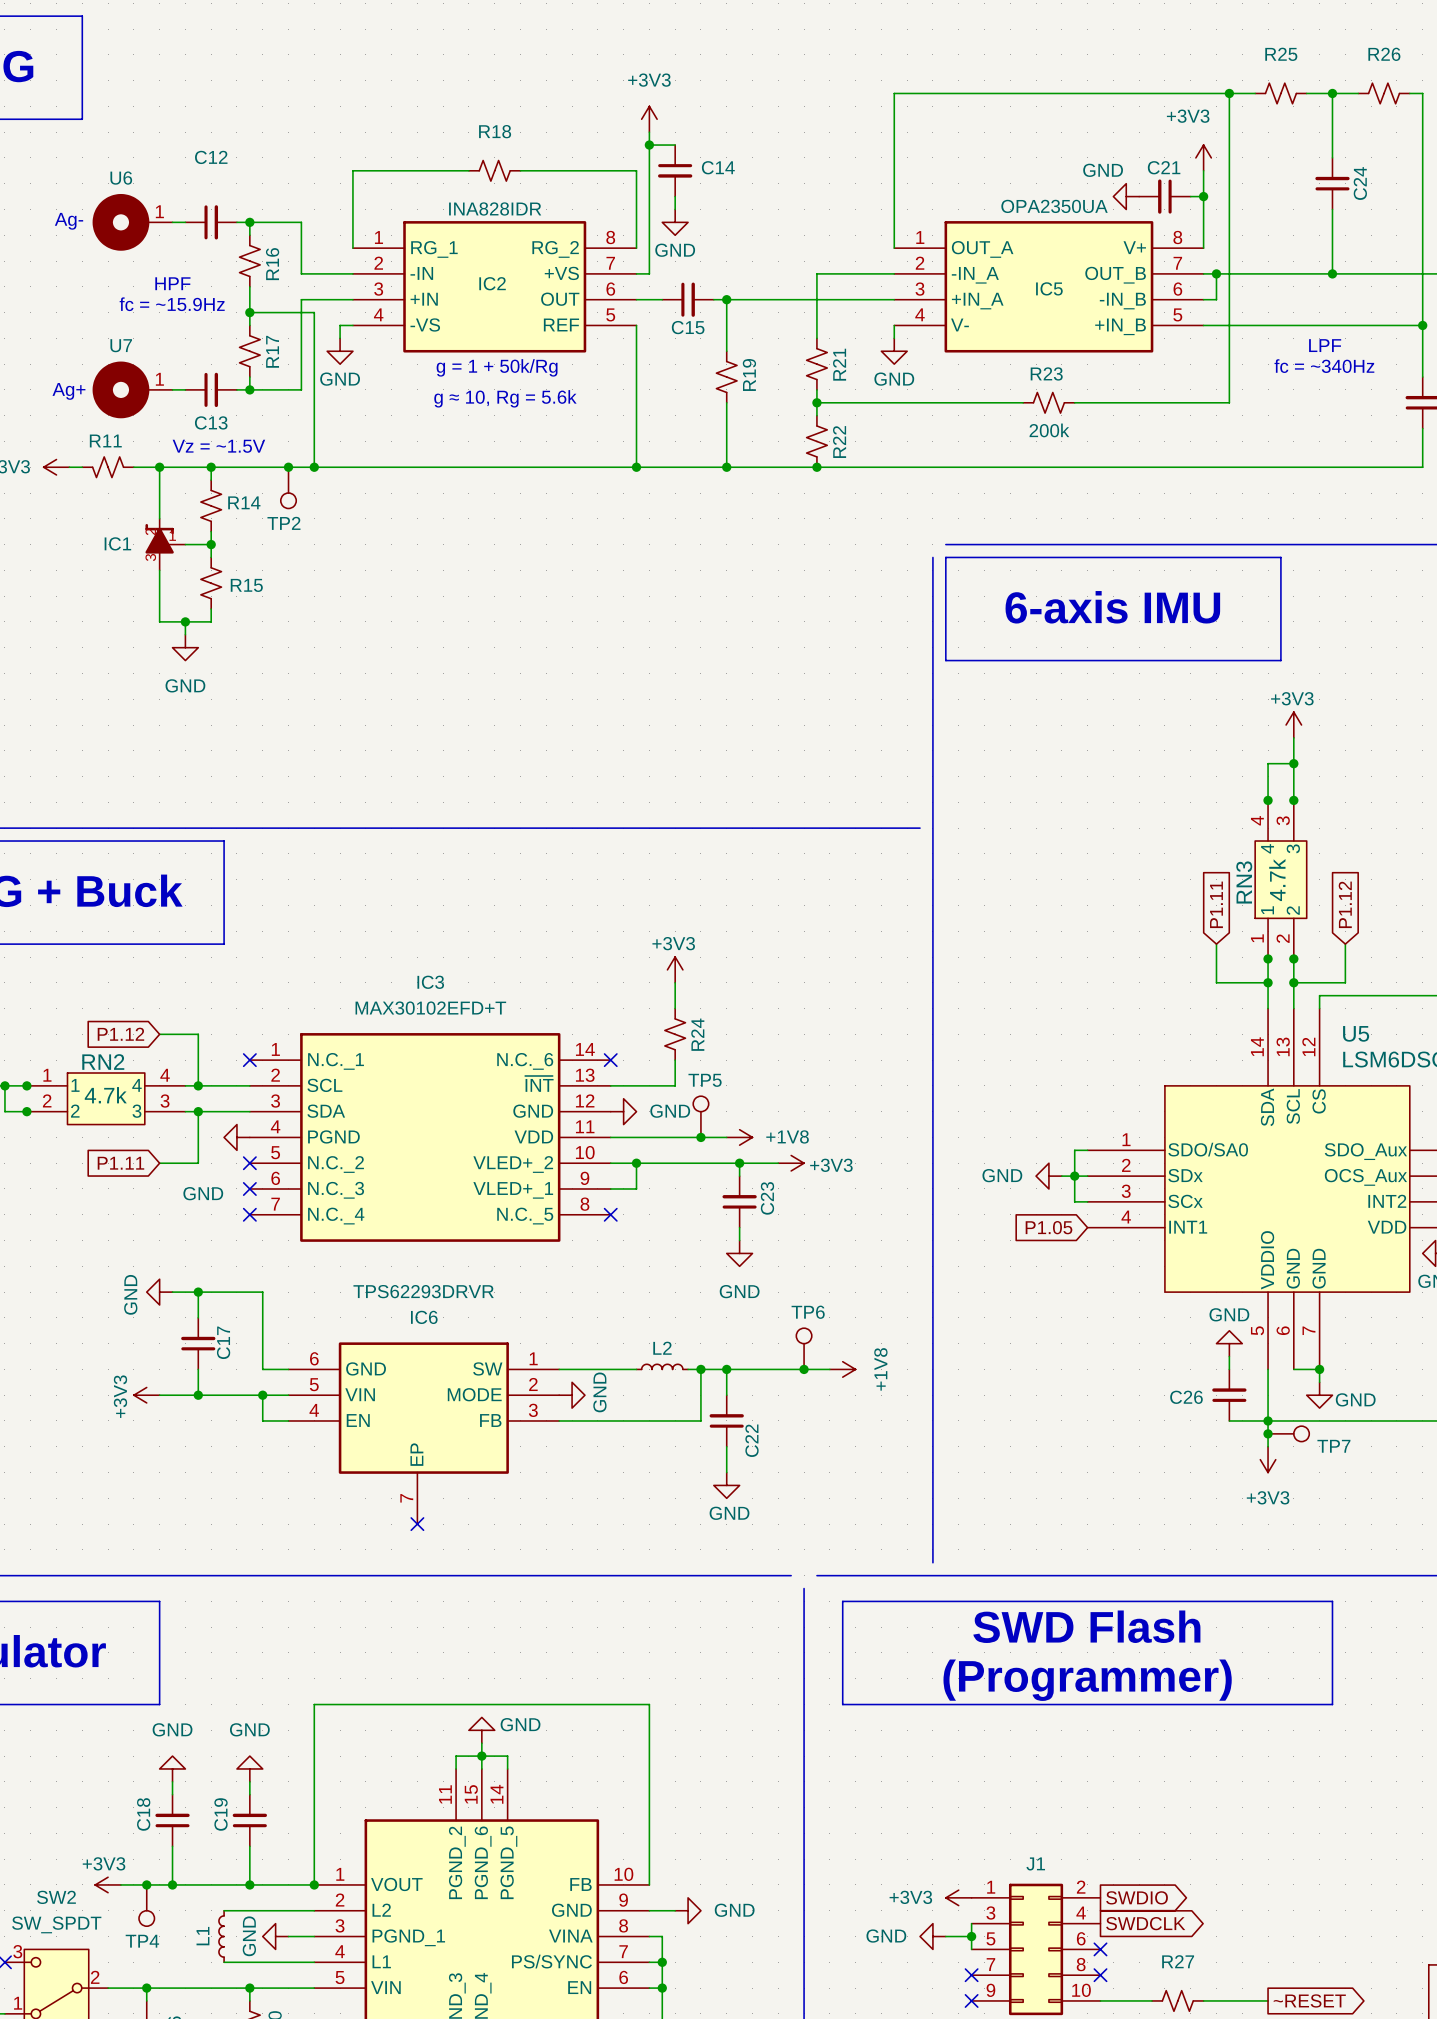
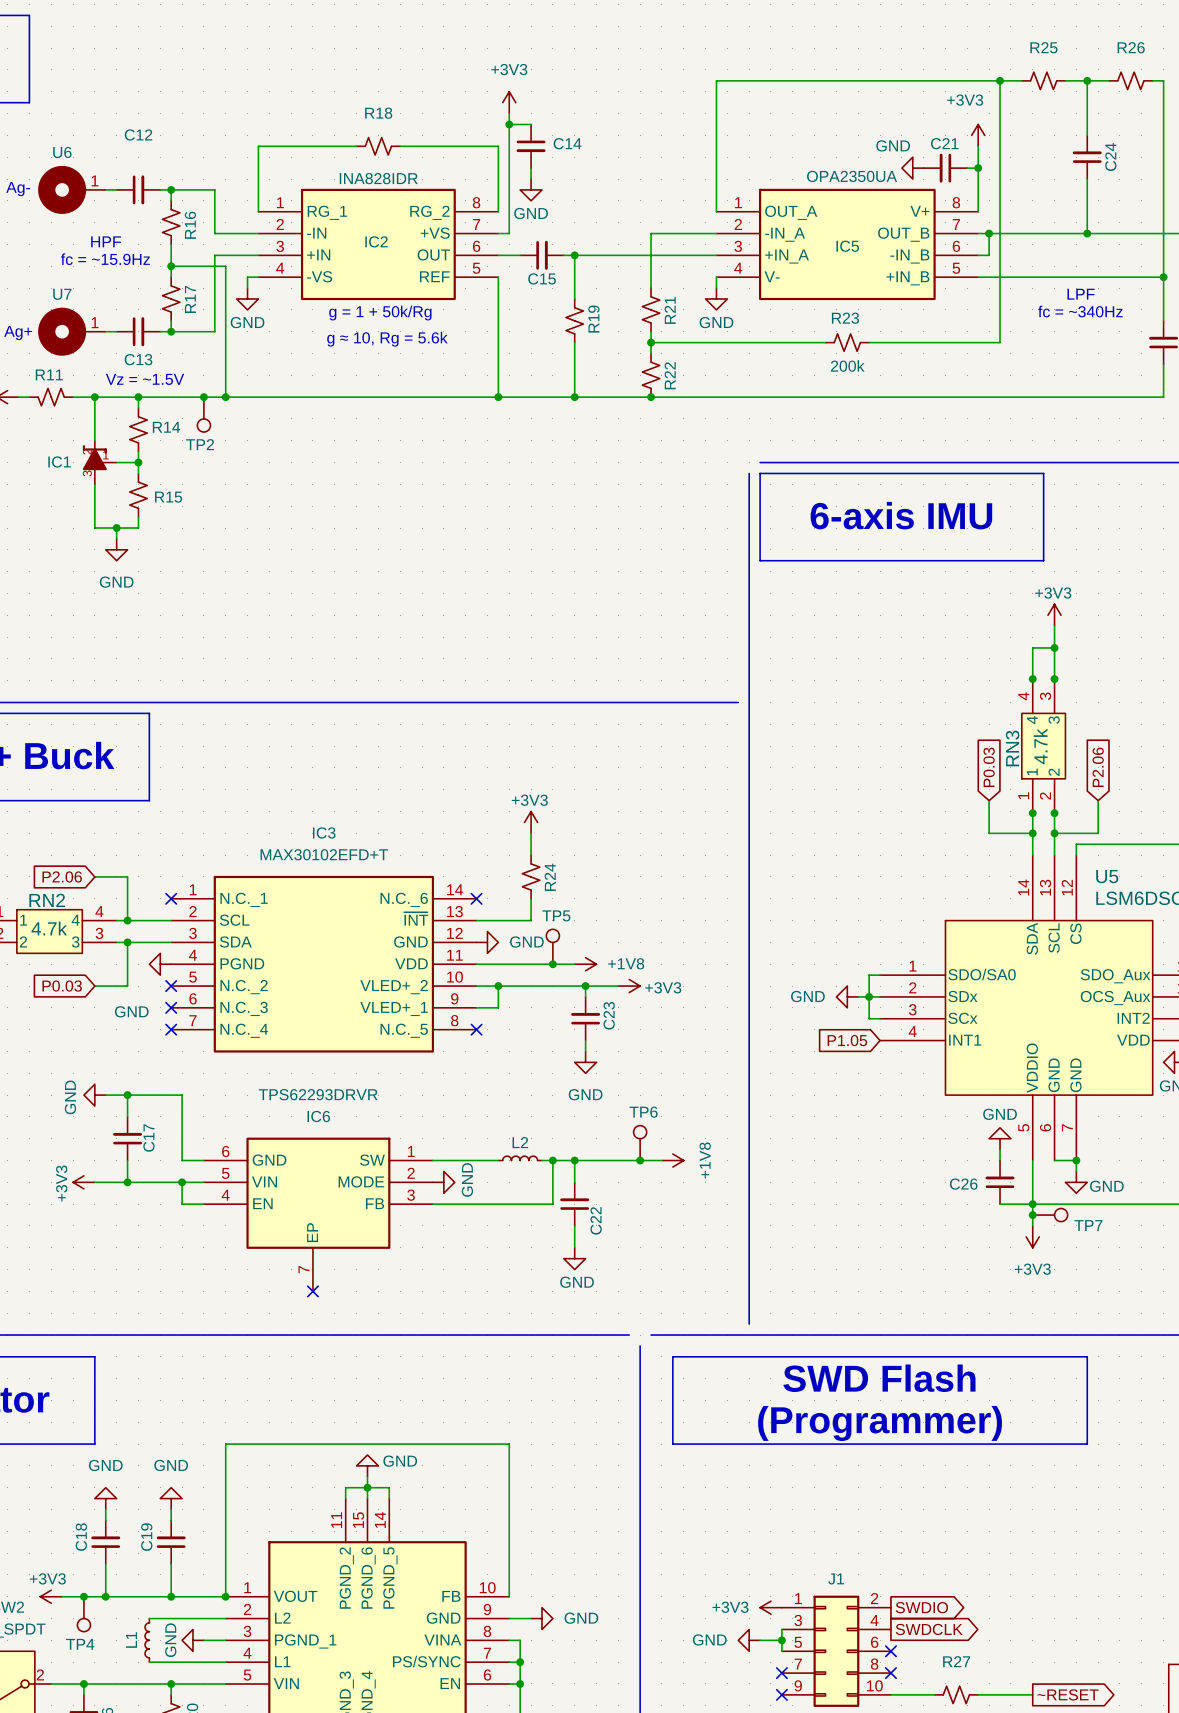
global label: P1.11 (1216, 904) -> P0.03 (989, 767)
global label: P1.12 (1345, 904) -> P2.06 (1098, 767)
global label: P1.12 (120, 1034) -> P2.06 (62, 876)
global label: P1.11 (120, 1163) -> P0.03 (62, 986)

